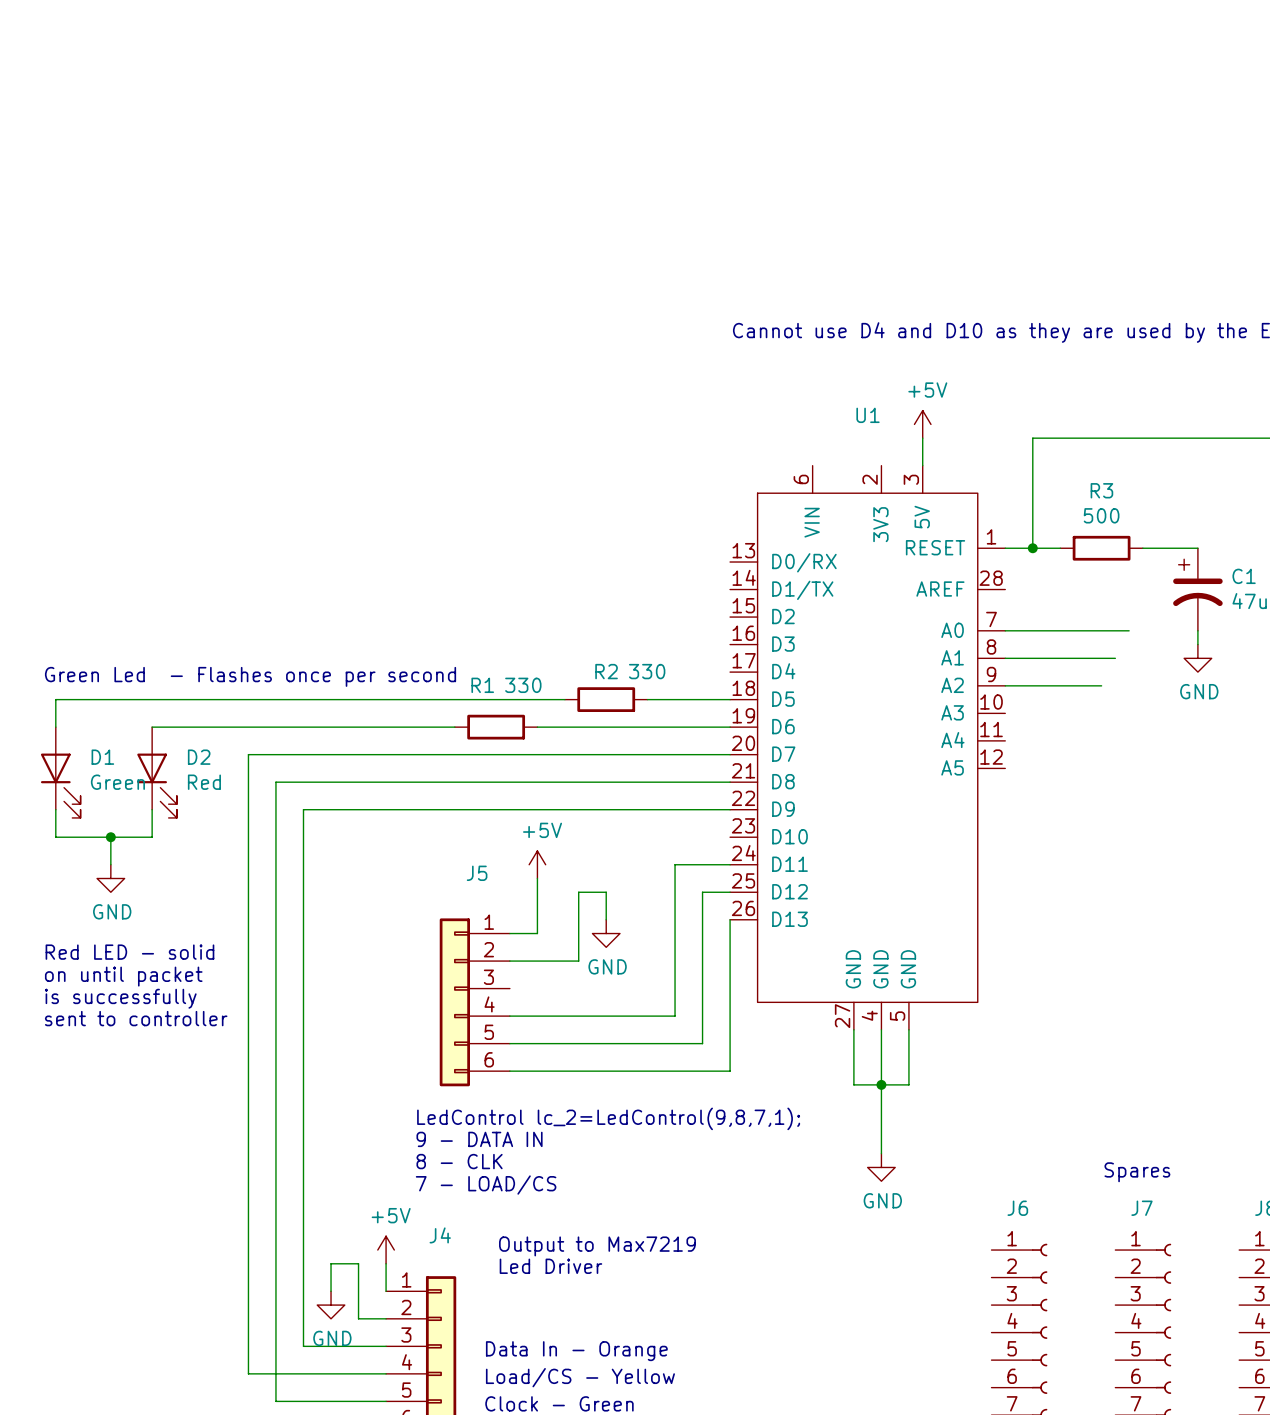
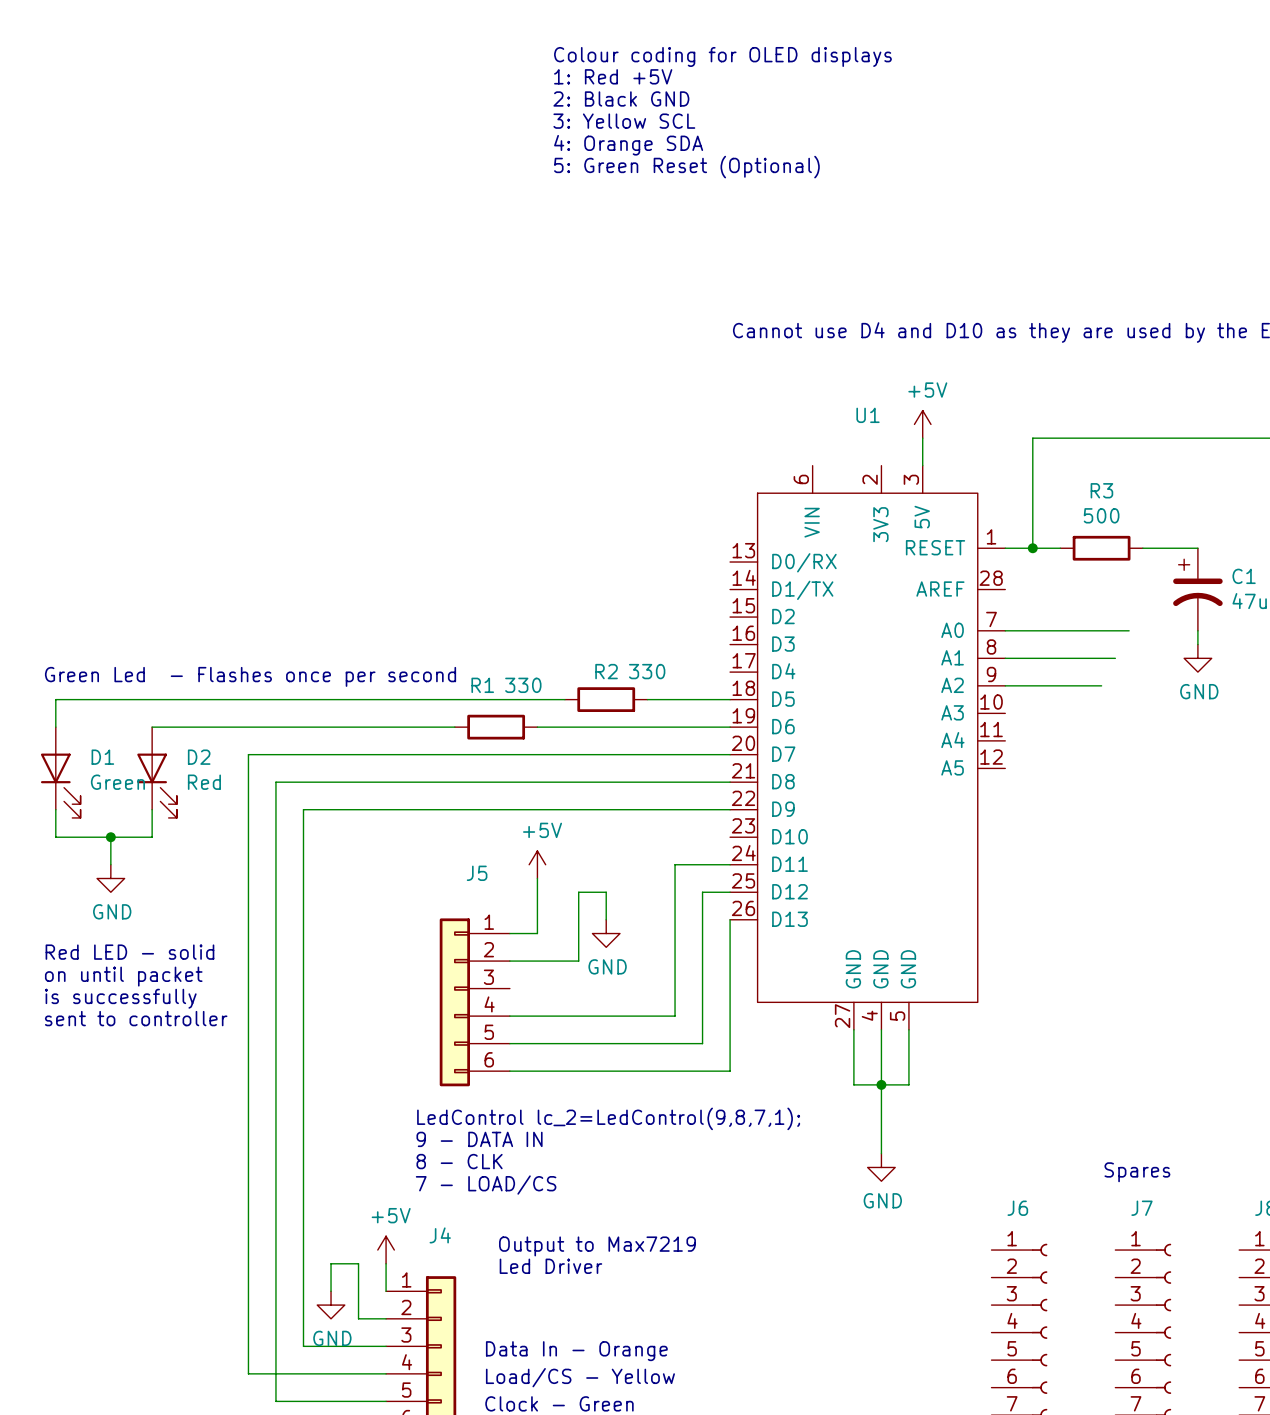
text: none -> Colour coding for OLED displays (722, 56)
text: none -> 1: Red +5V (613, 76)
text: none -> 2: Black GND (621, 98)
text: none -> 3: Yellow SCL (624, 121)
text: none -> 4: Orange SDA (628, 145)
text: none -> 5: Green Reset (Optional) (686, 167)

